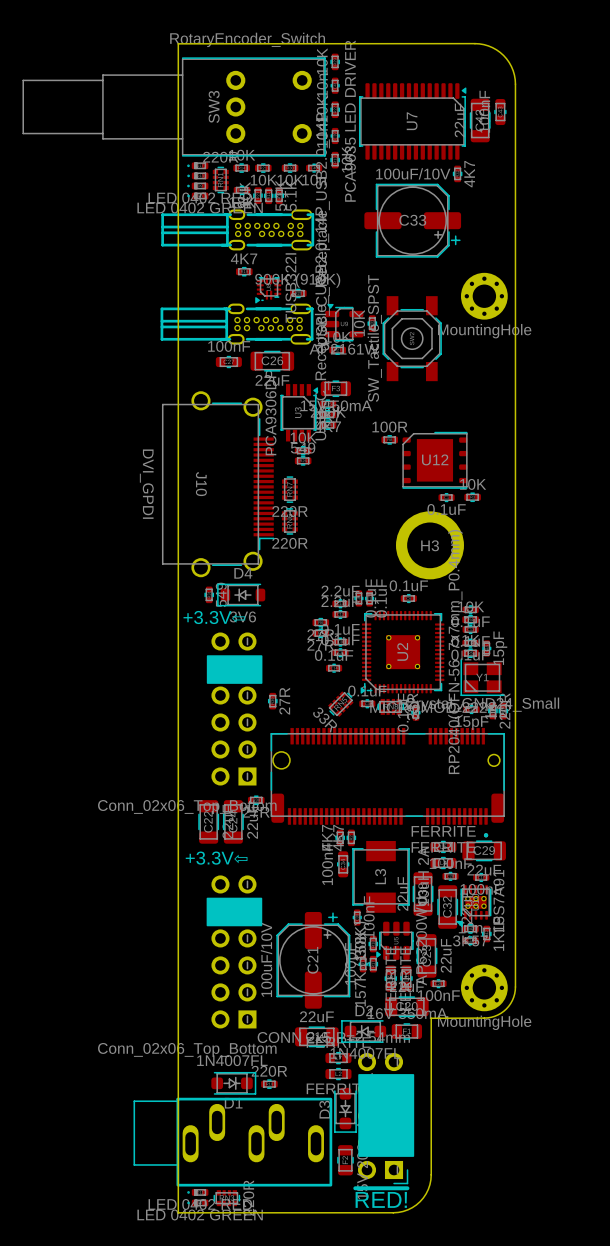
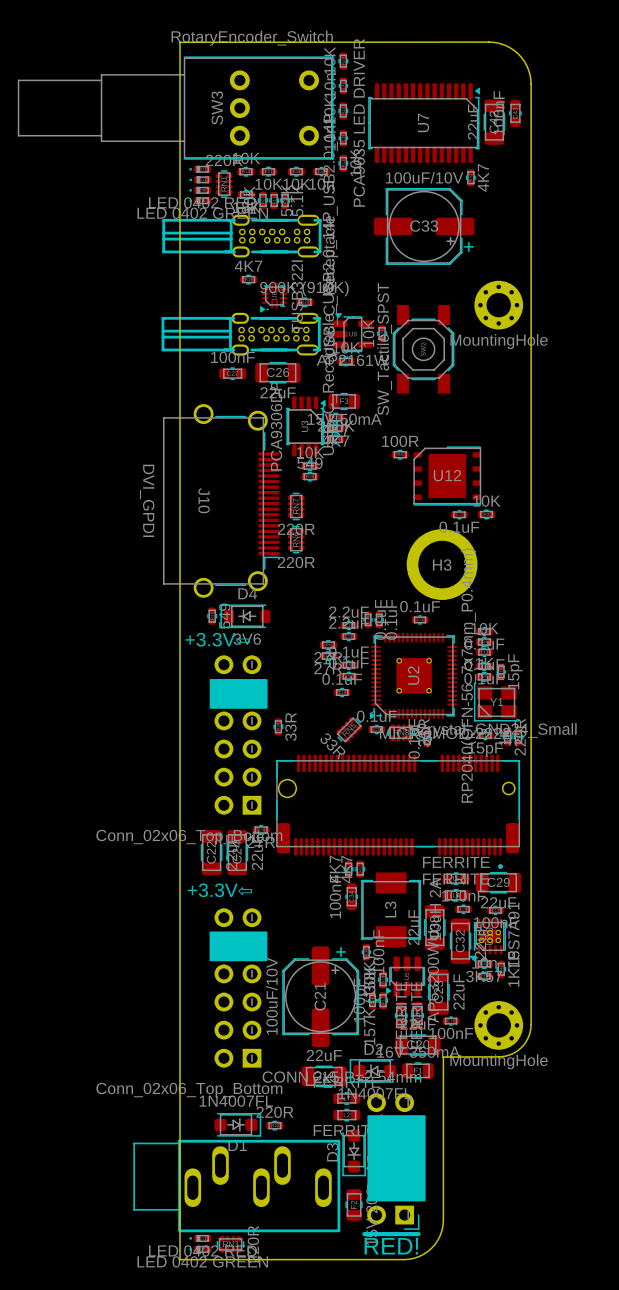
part value: 27R (284, 701) -> 33R (290, 726)

